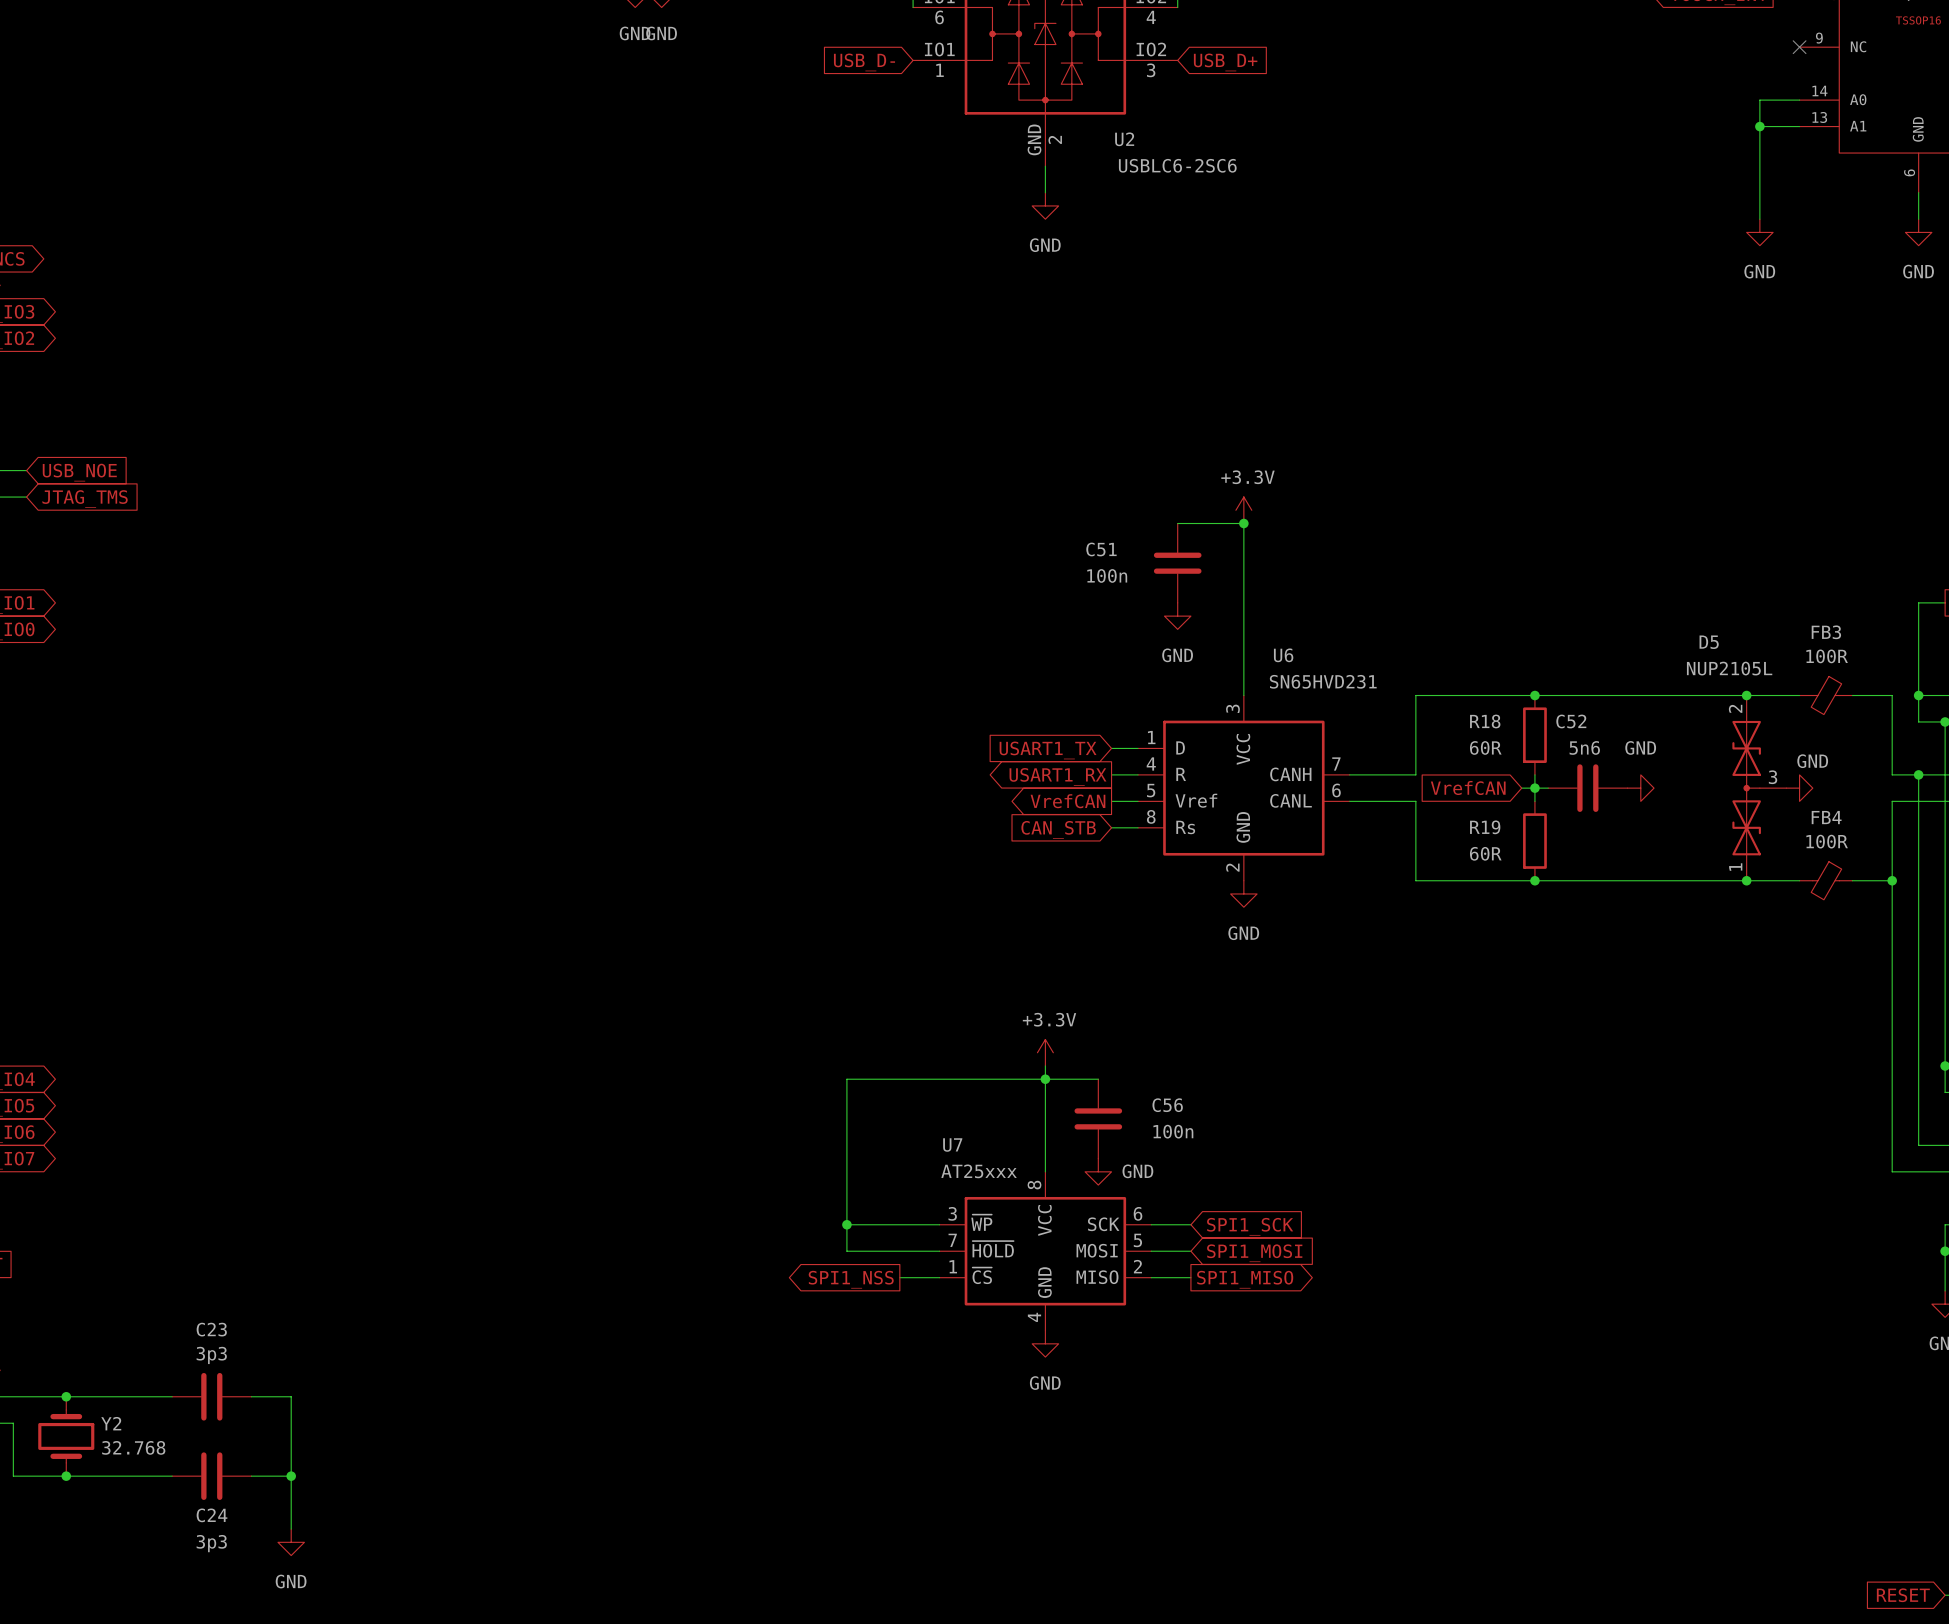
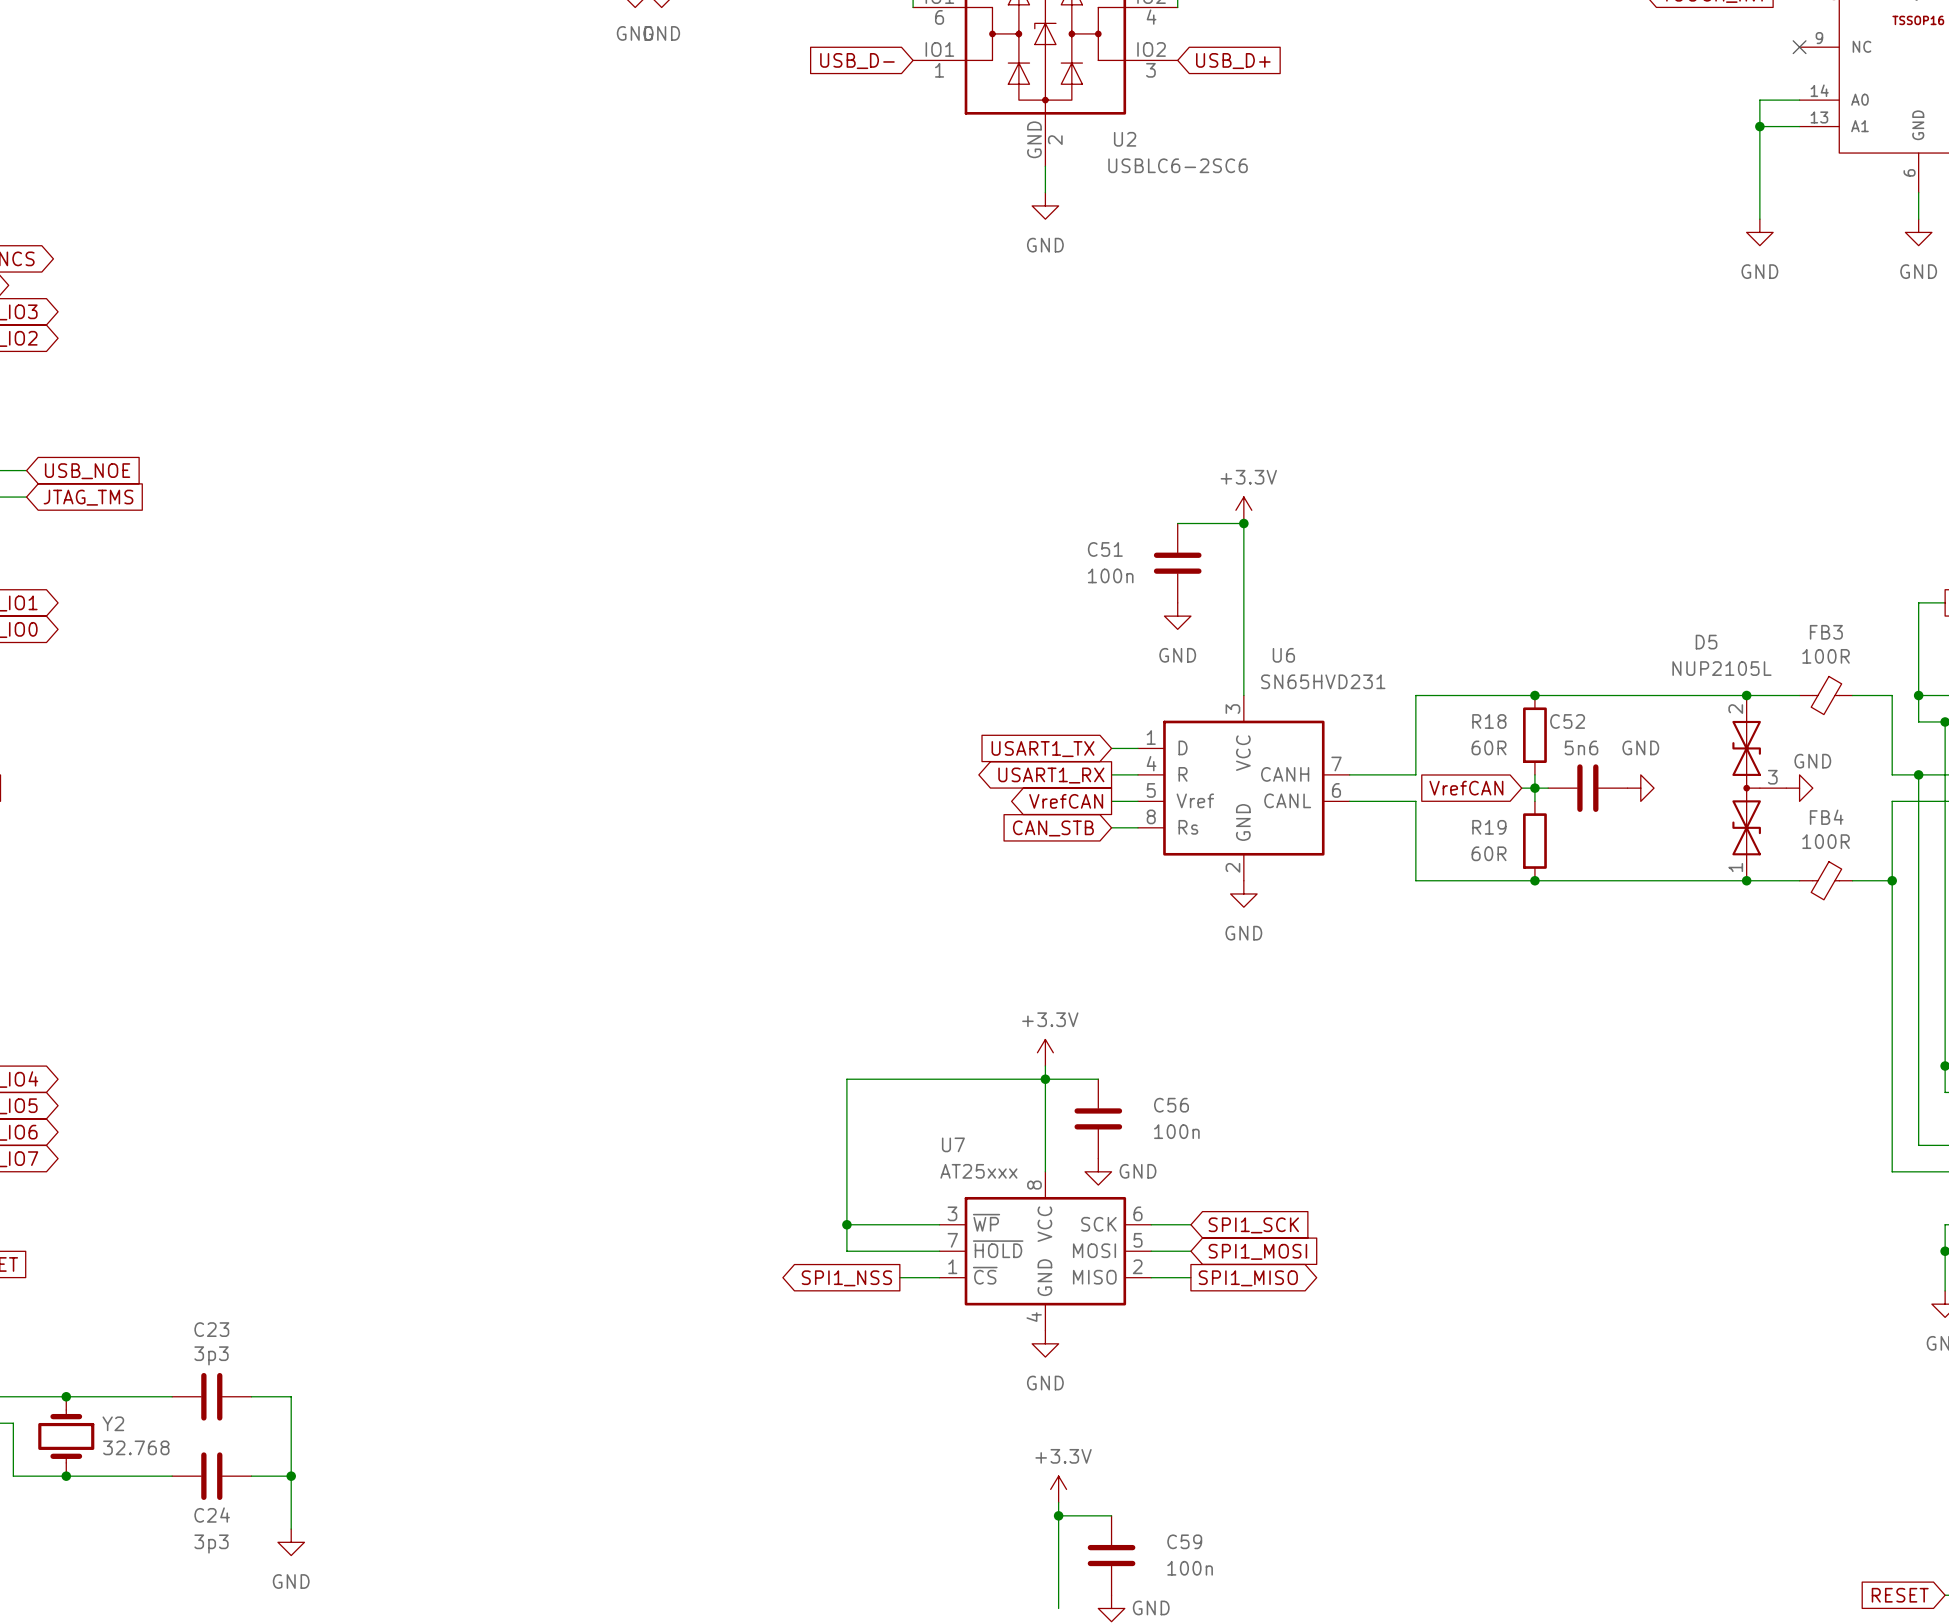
power symbol: none -> +3.3V (1058, 1489)
wire: none -> (1058, 1502) (1058, 1608)
wire: none -> (1058, 1515) (1111, 1515)
junction: none -> (1058, 1515)
C59: none -> 100n (1111, 1555)
power symbol: none -> GND (1111, 1608)

